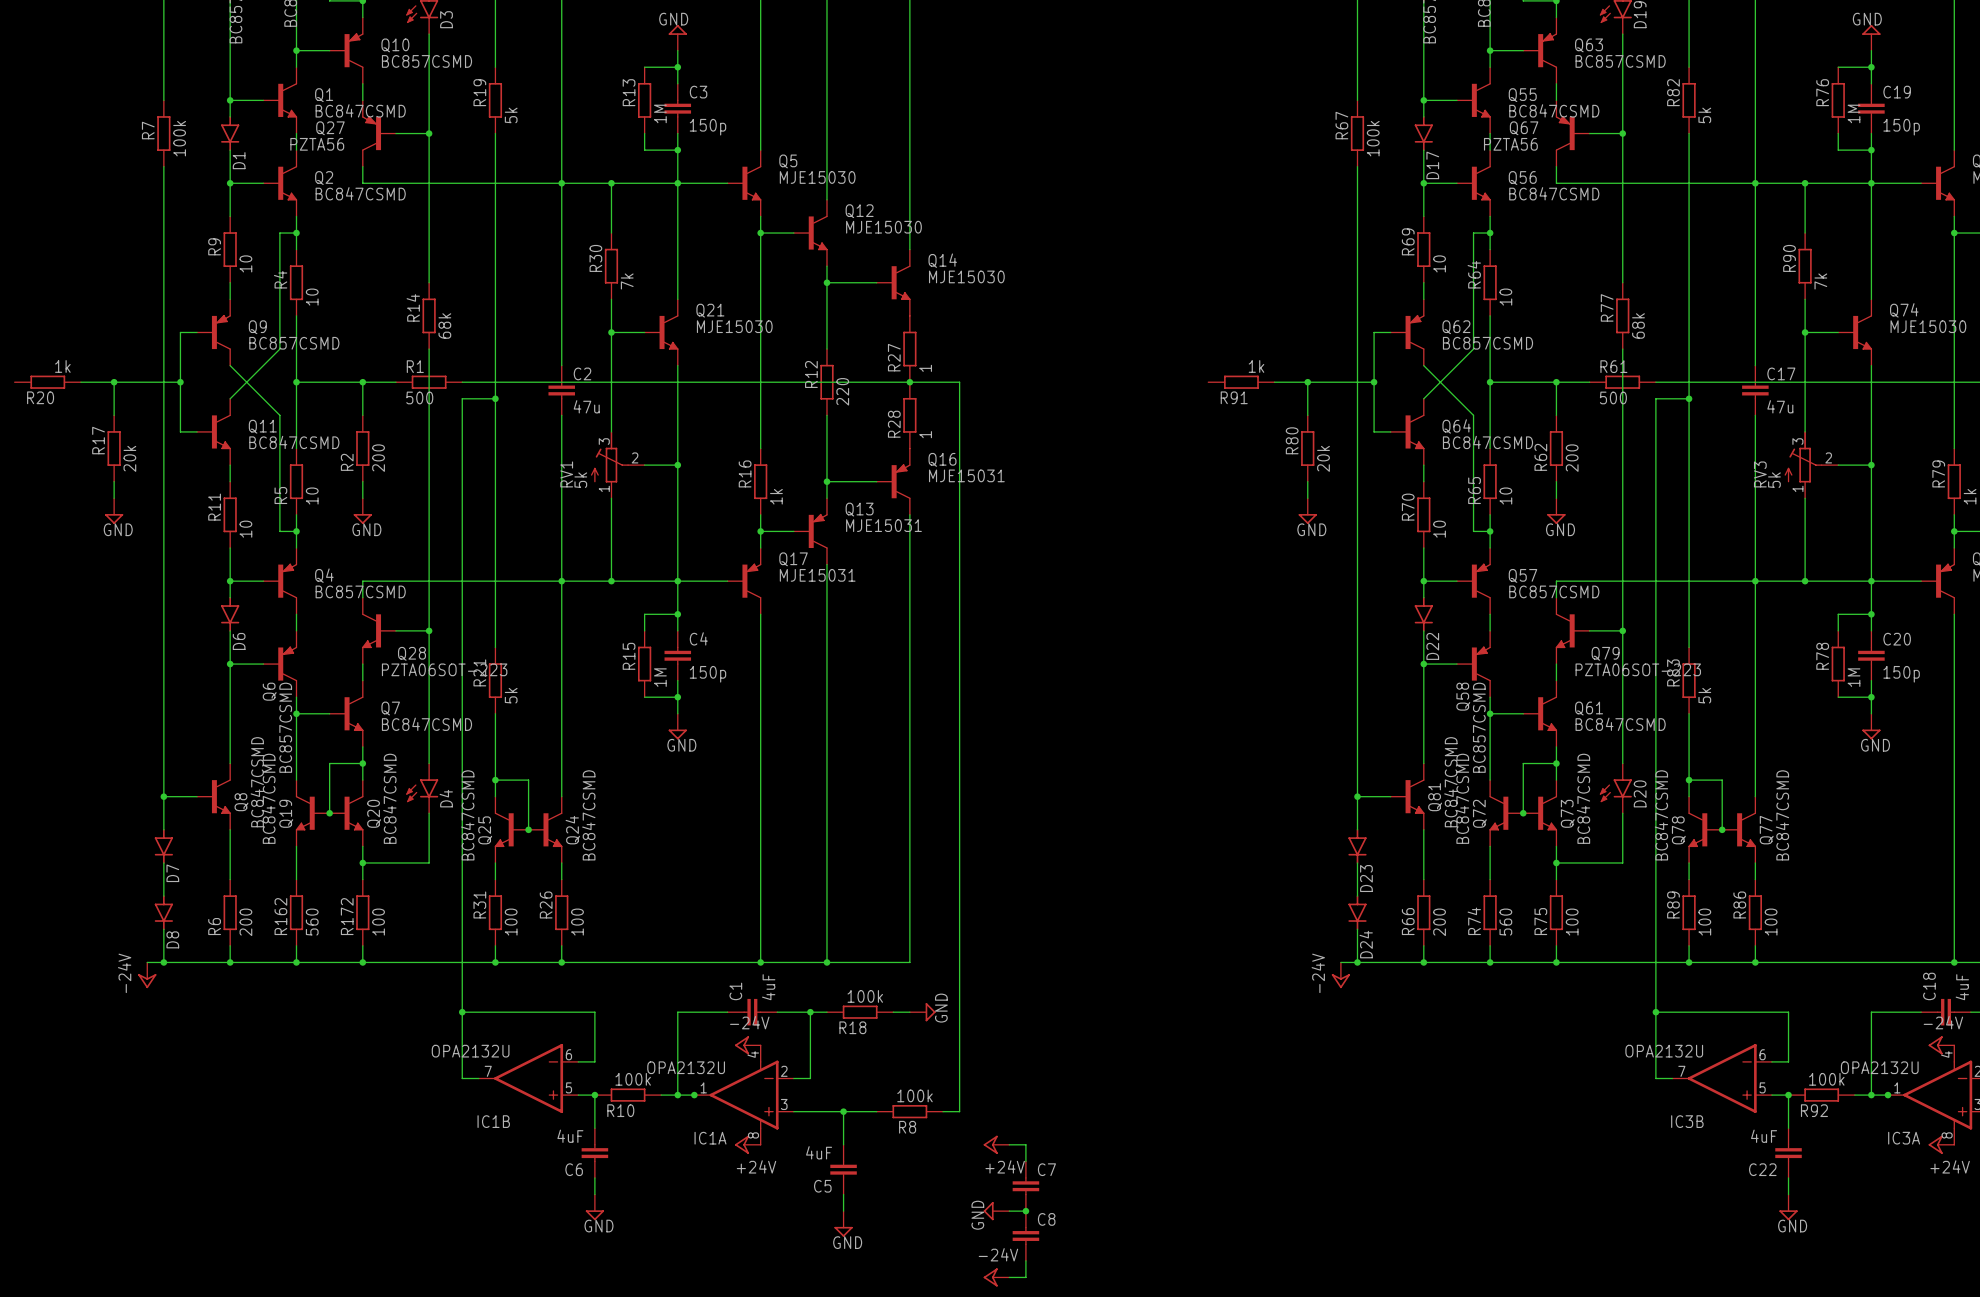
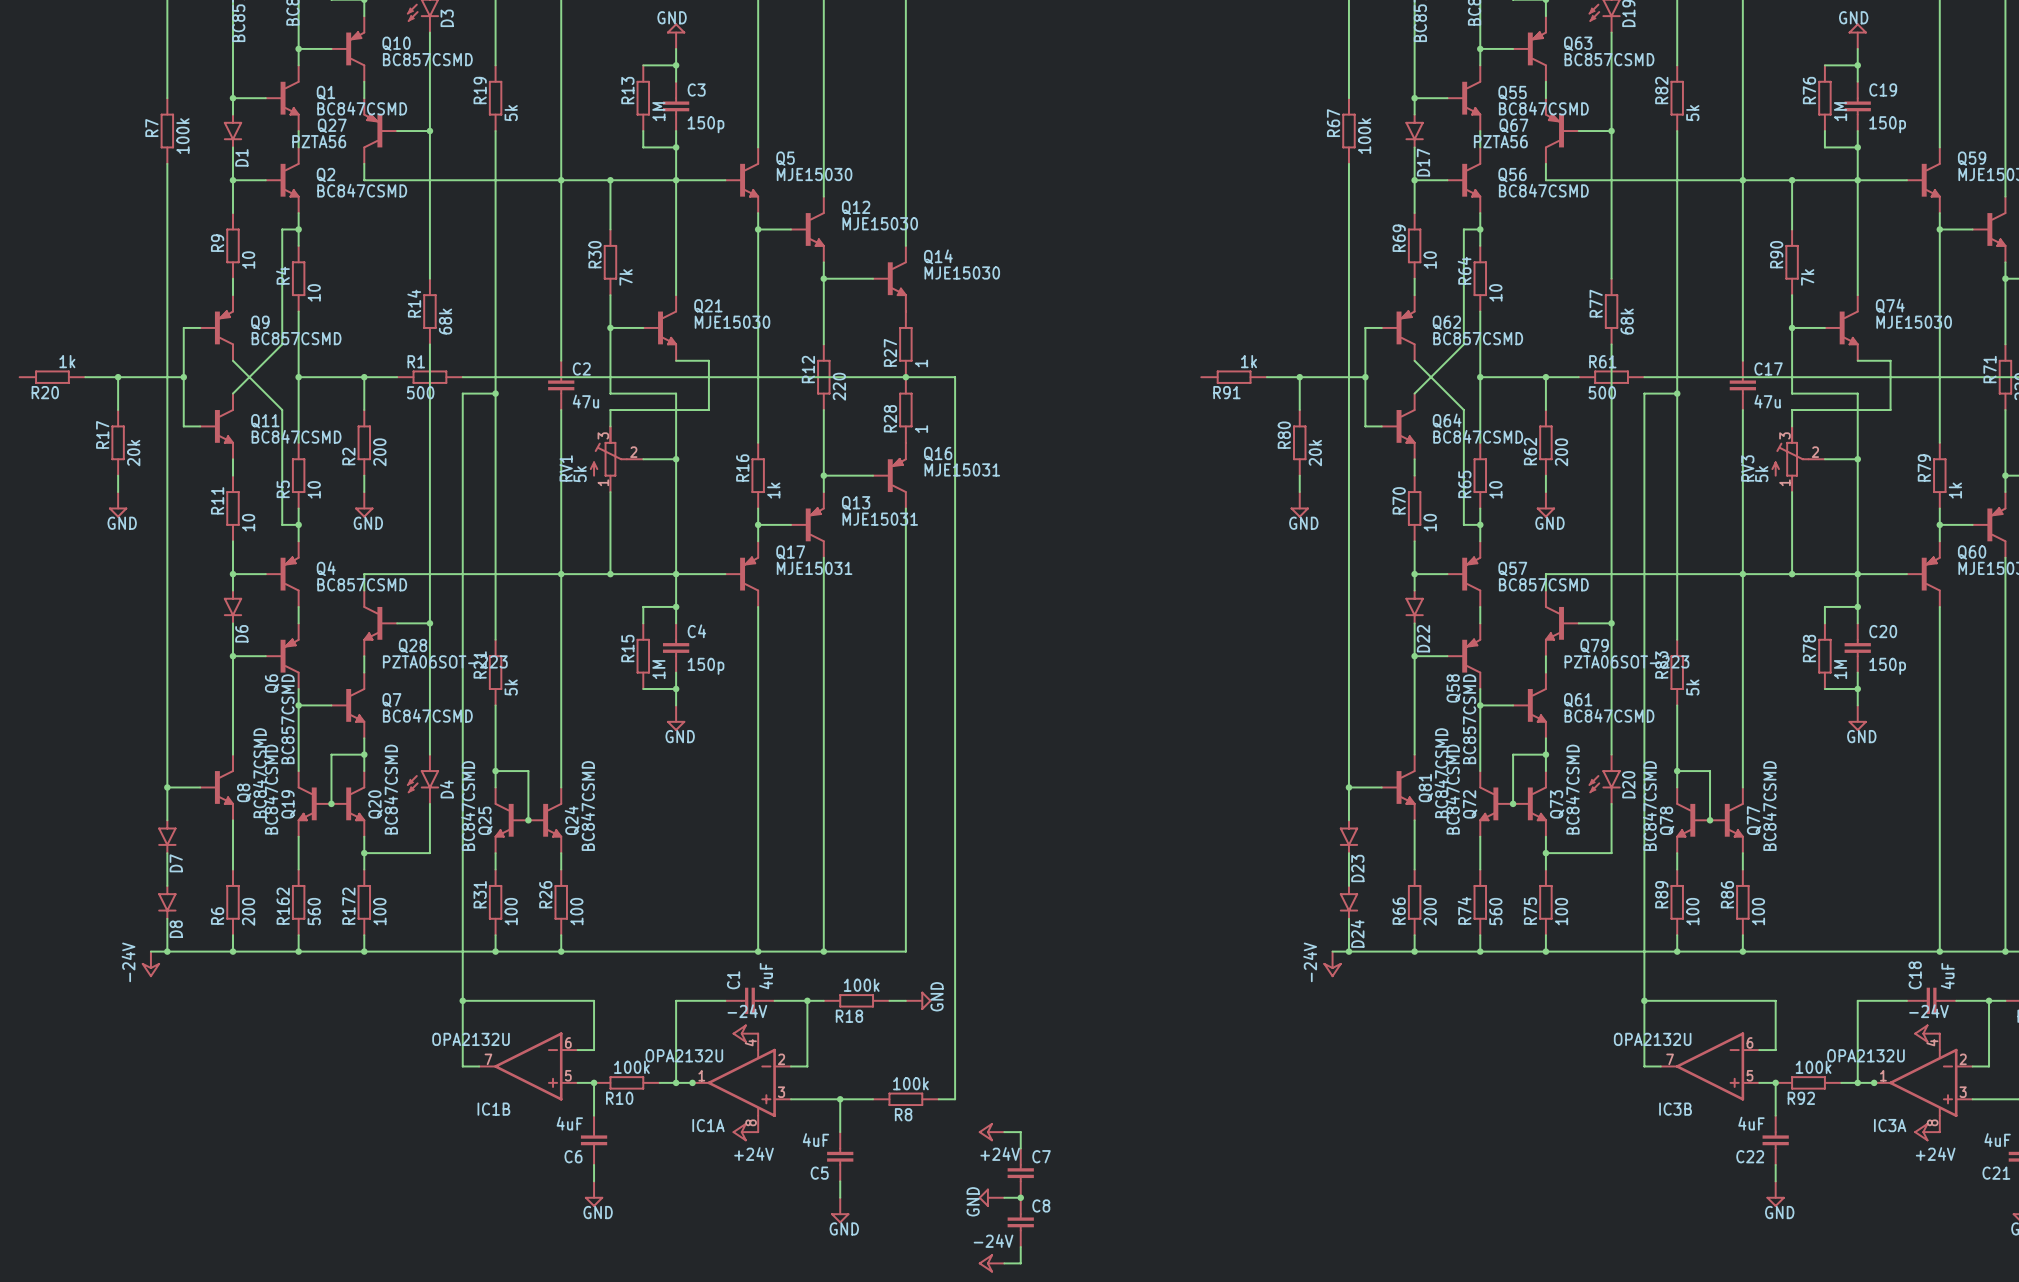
wire: (677, 365) (677, 398) -> (676, 360) (708, 360) (708, 410) (610, 410)
wire: (1871, 365) (1871, 398) -> (1857, 360) (1890, 360) (1890, 410) (1792, 410)
wire: (611, 398) (611, 415) -> (610, 393) (676, 393)
wire: (1805, 398) (1805, 415) -> (1792, 393) (1857, 393)

